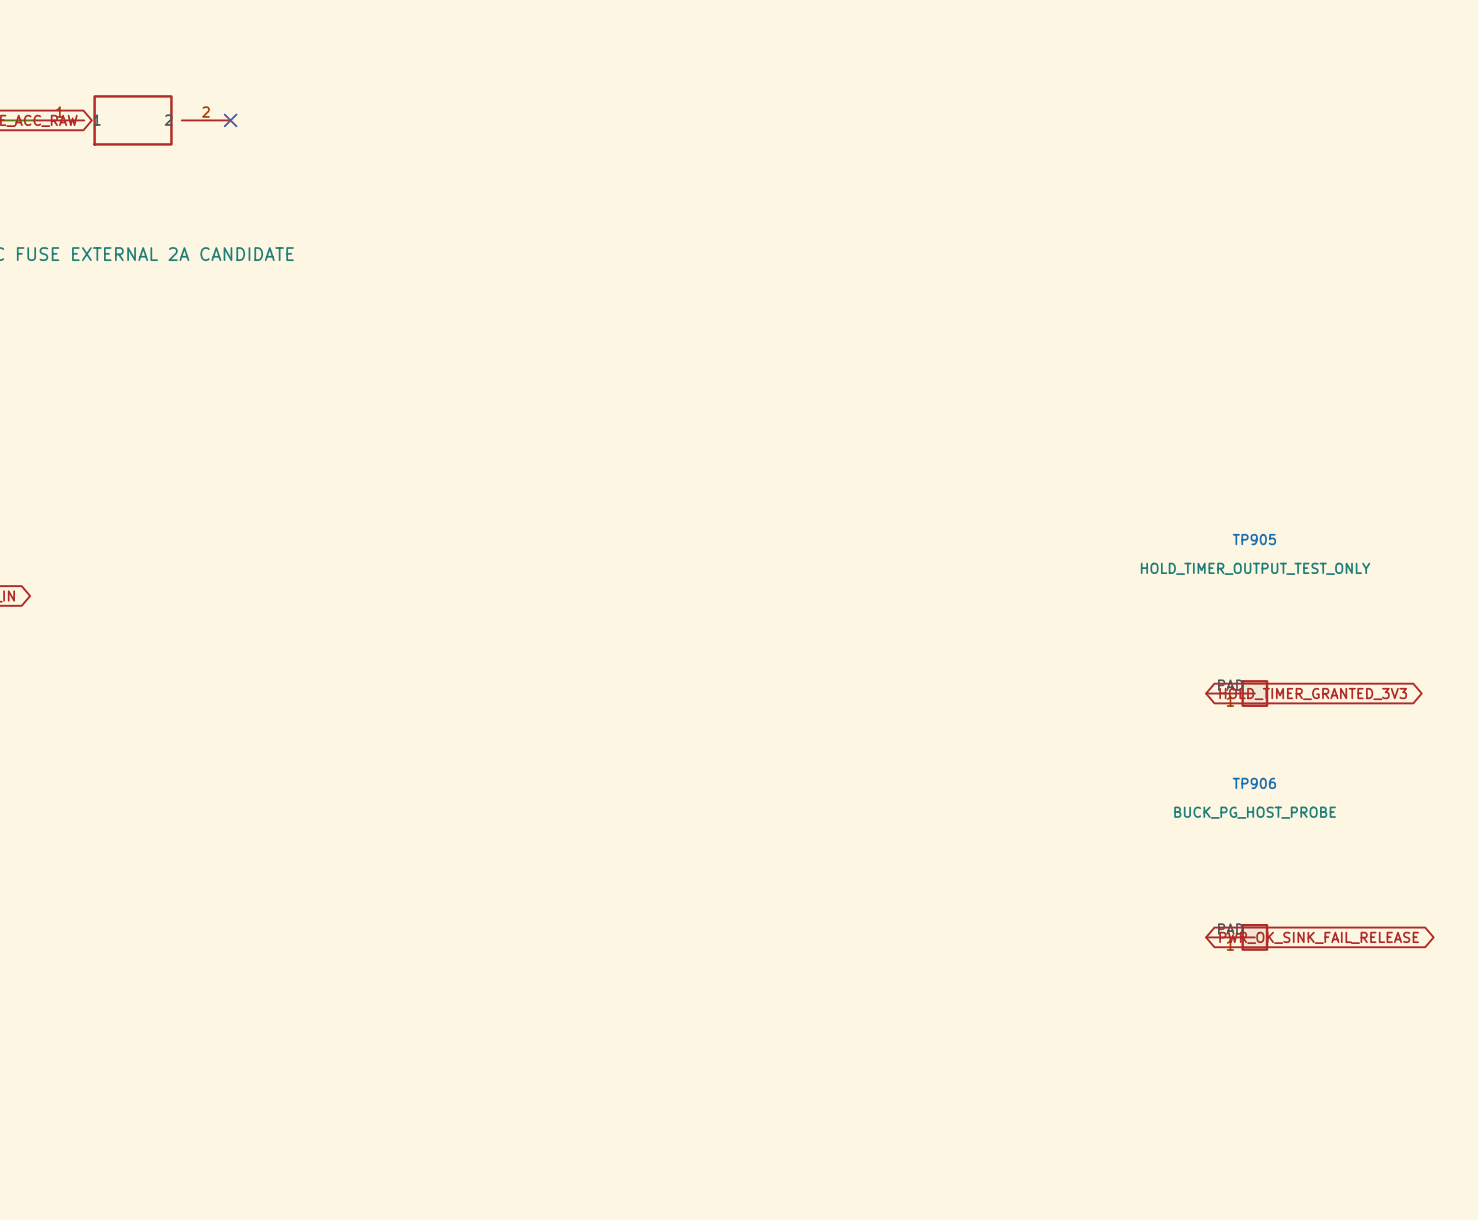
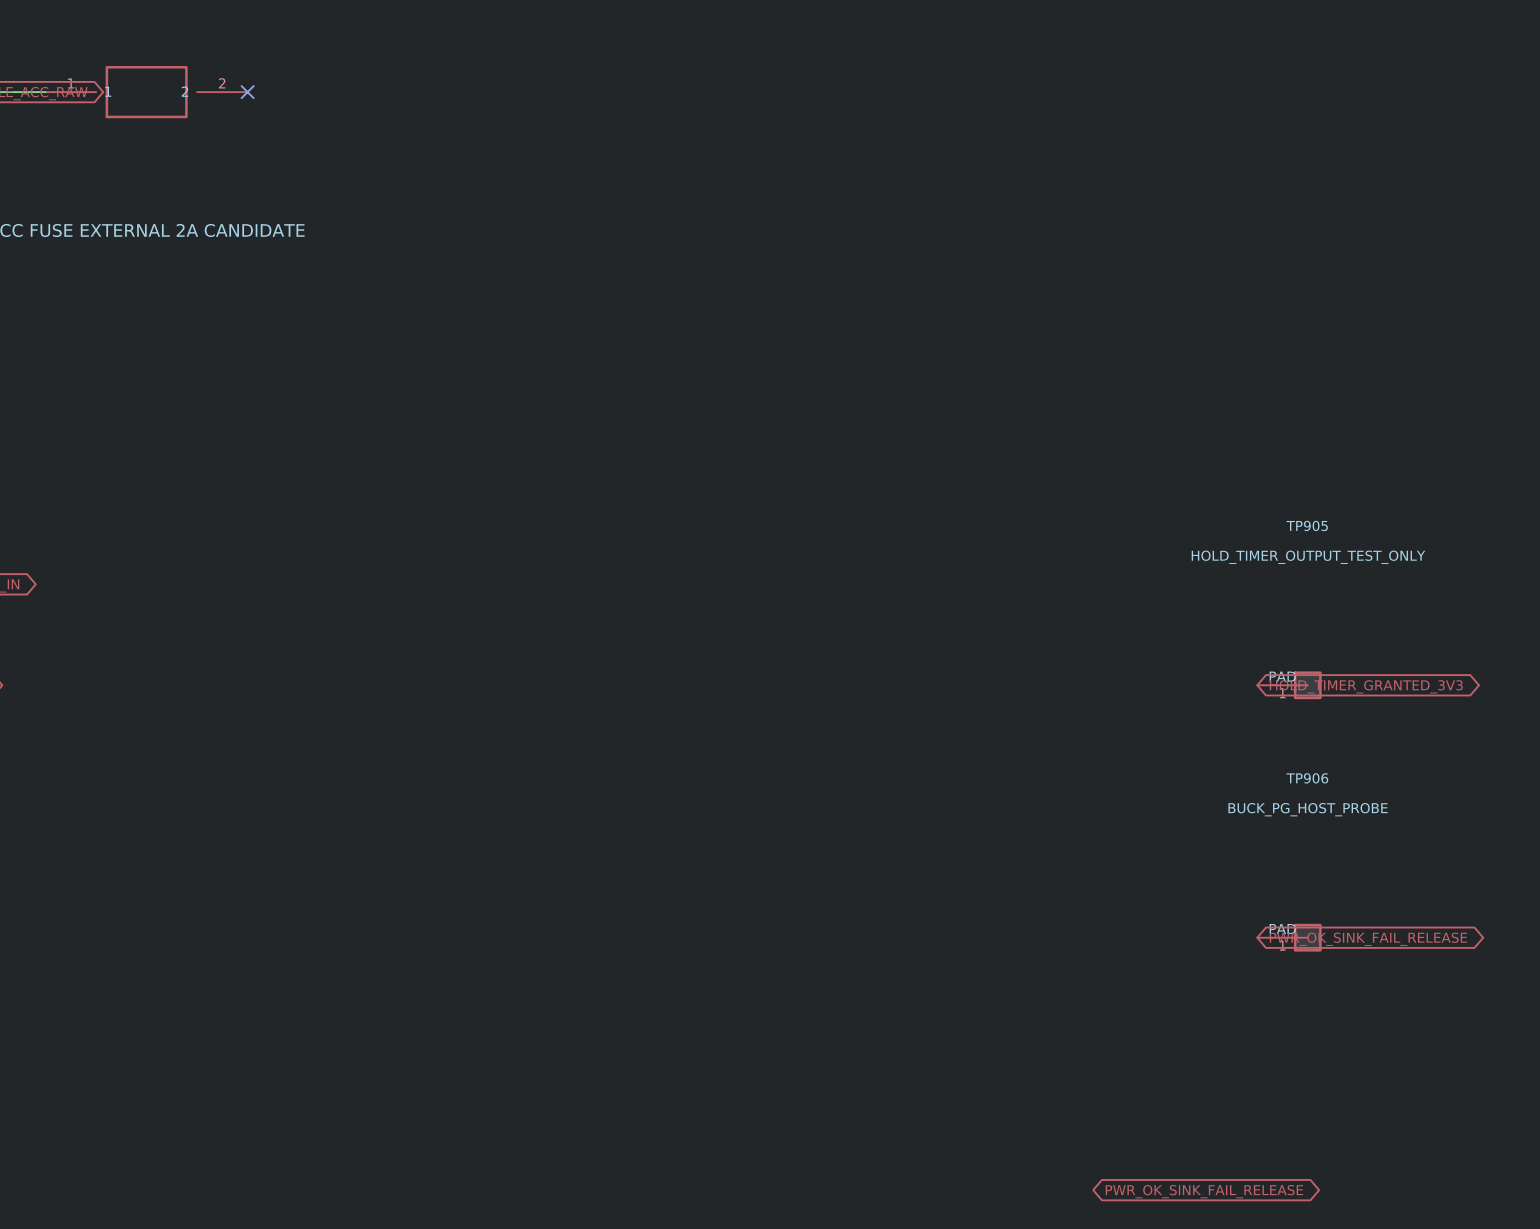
global label: none -> PWR_OK_SINK_FAIL_RELEASE (1204, 1191)

